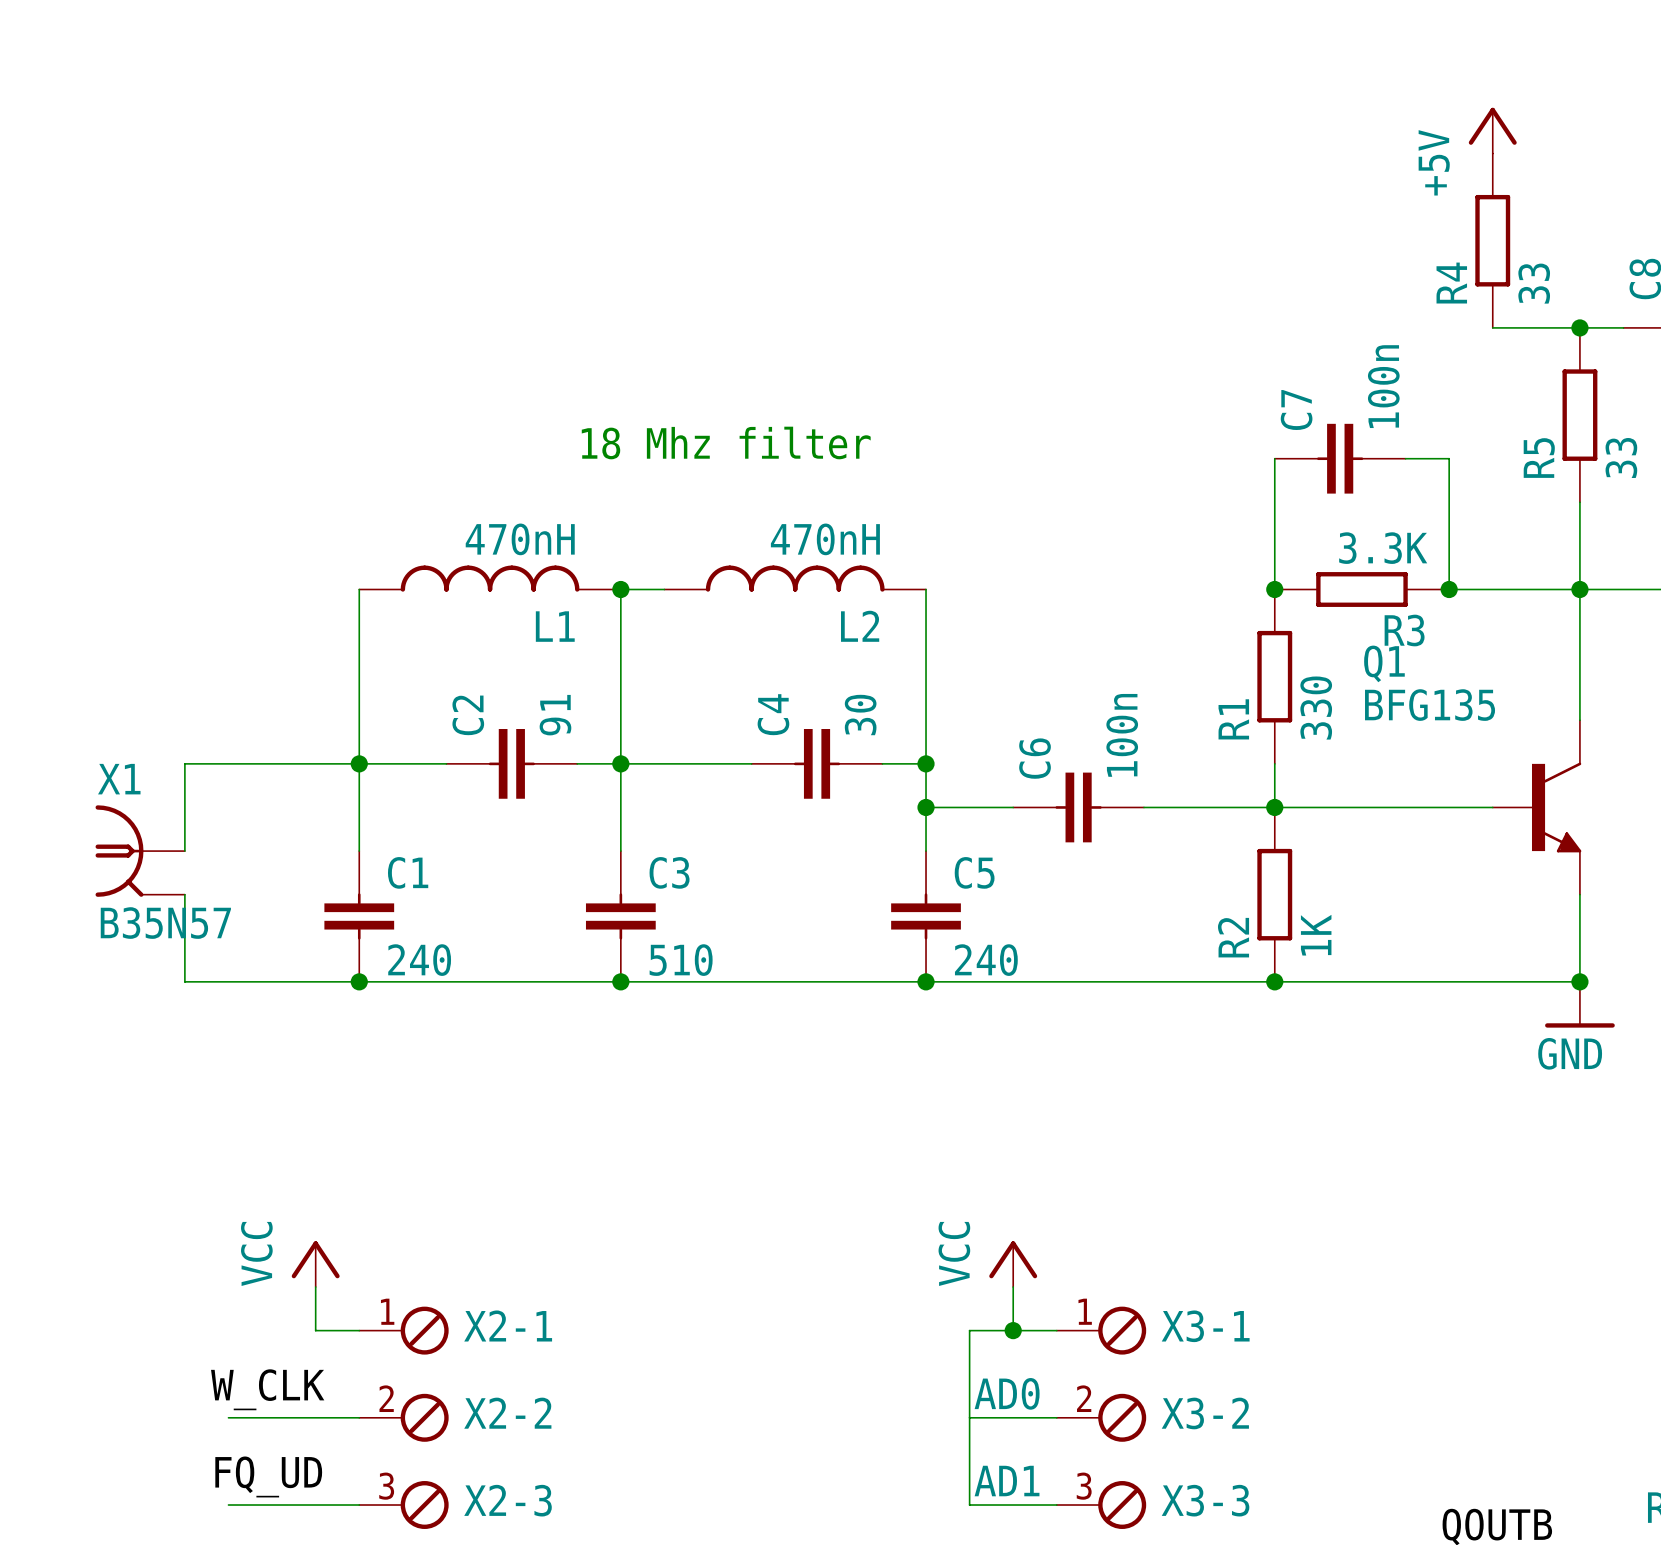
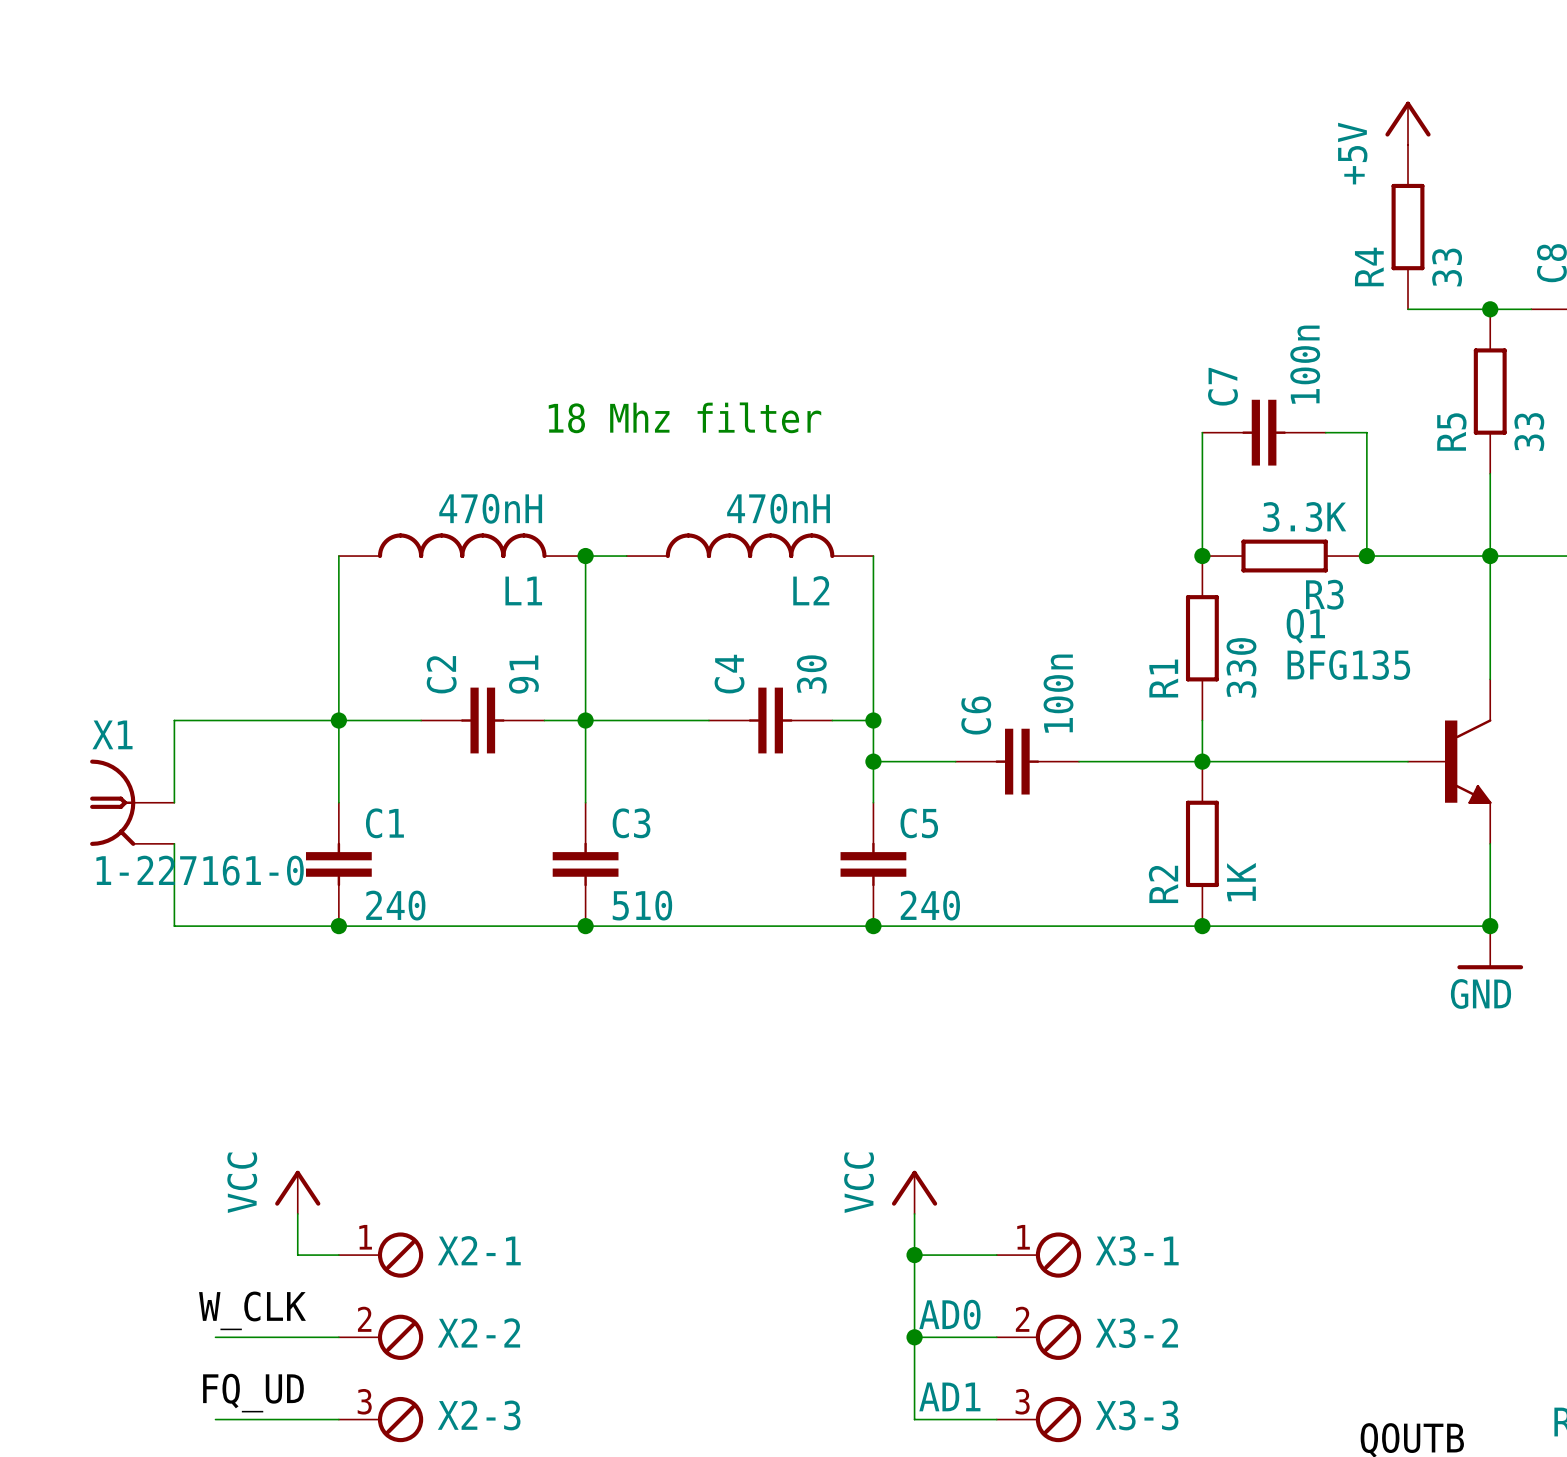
X1 value: B35N57 (165, 923) -> 1-227161-0 (200, 870)
power symbol position: VCC (1013, 1264) -> VCC (914, 1192)
wire: (1013, 1287) (1013, 1330) -> (914, 1213) (914, 1255)
junction position: (1013, 1330) -> (914, 1255)
junction: none -> (914, 1337)

